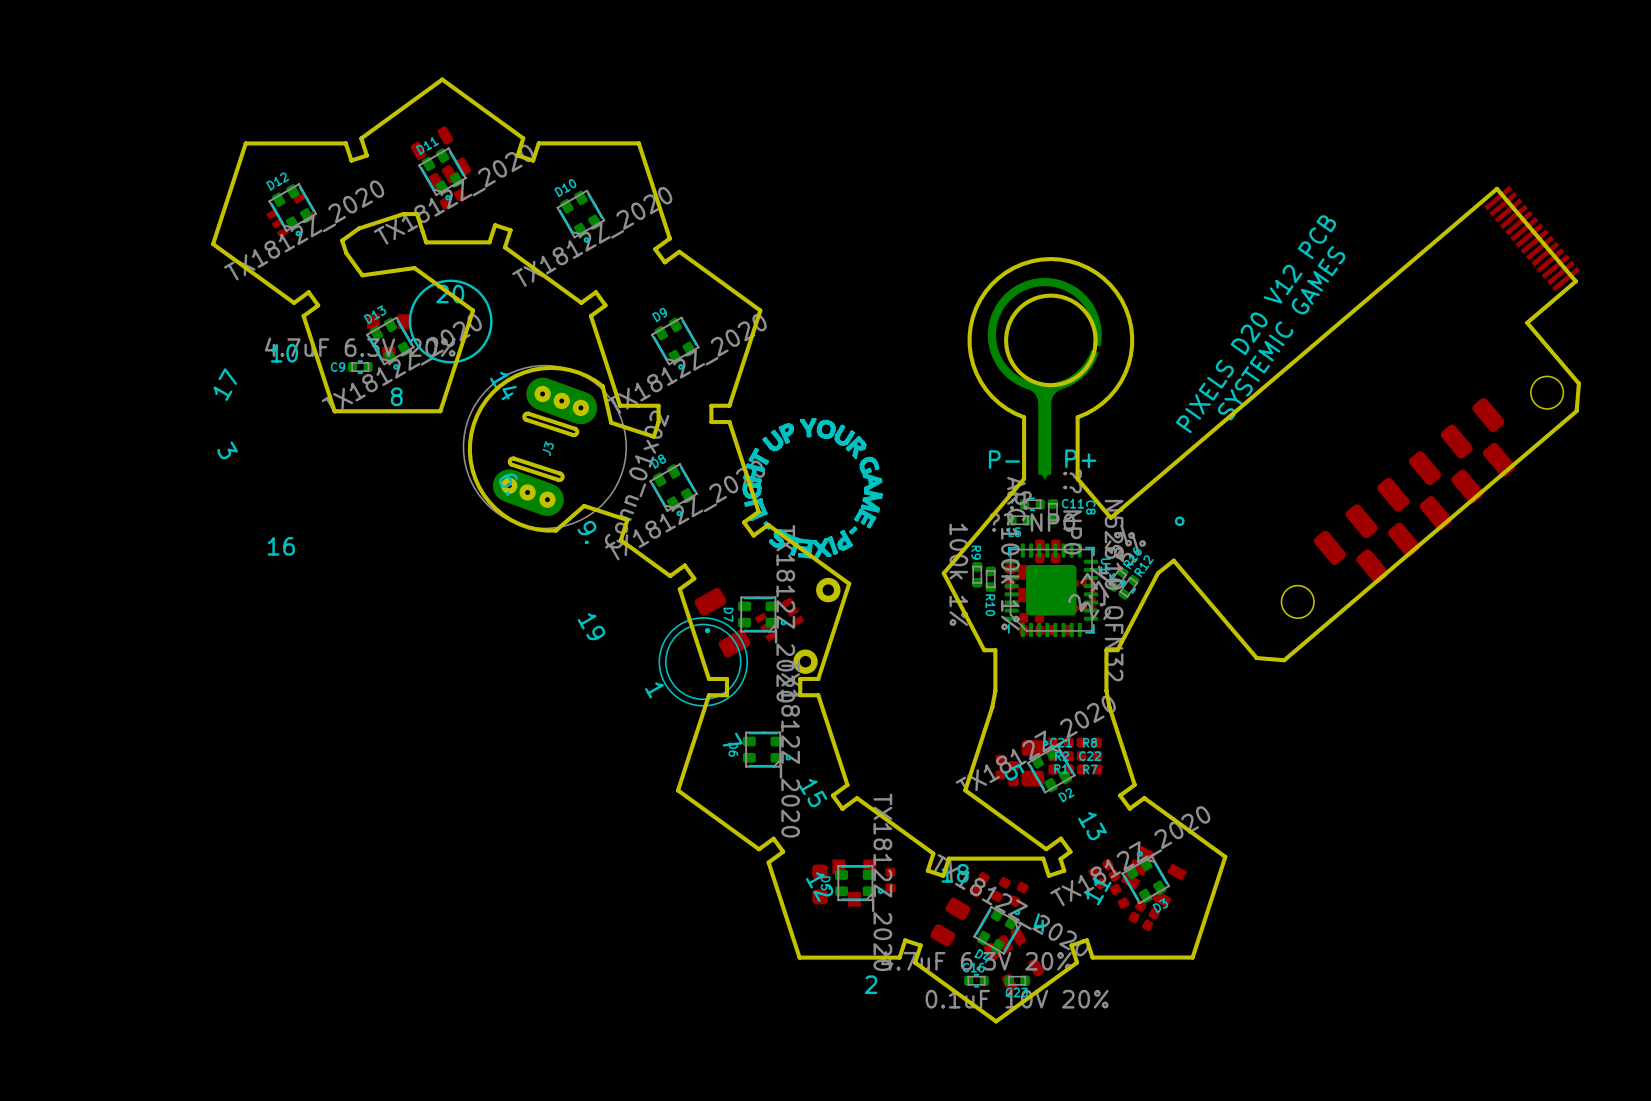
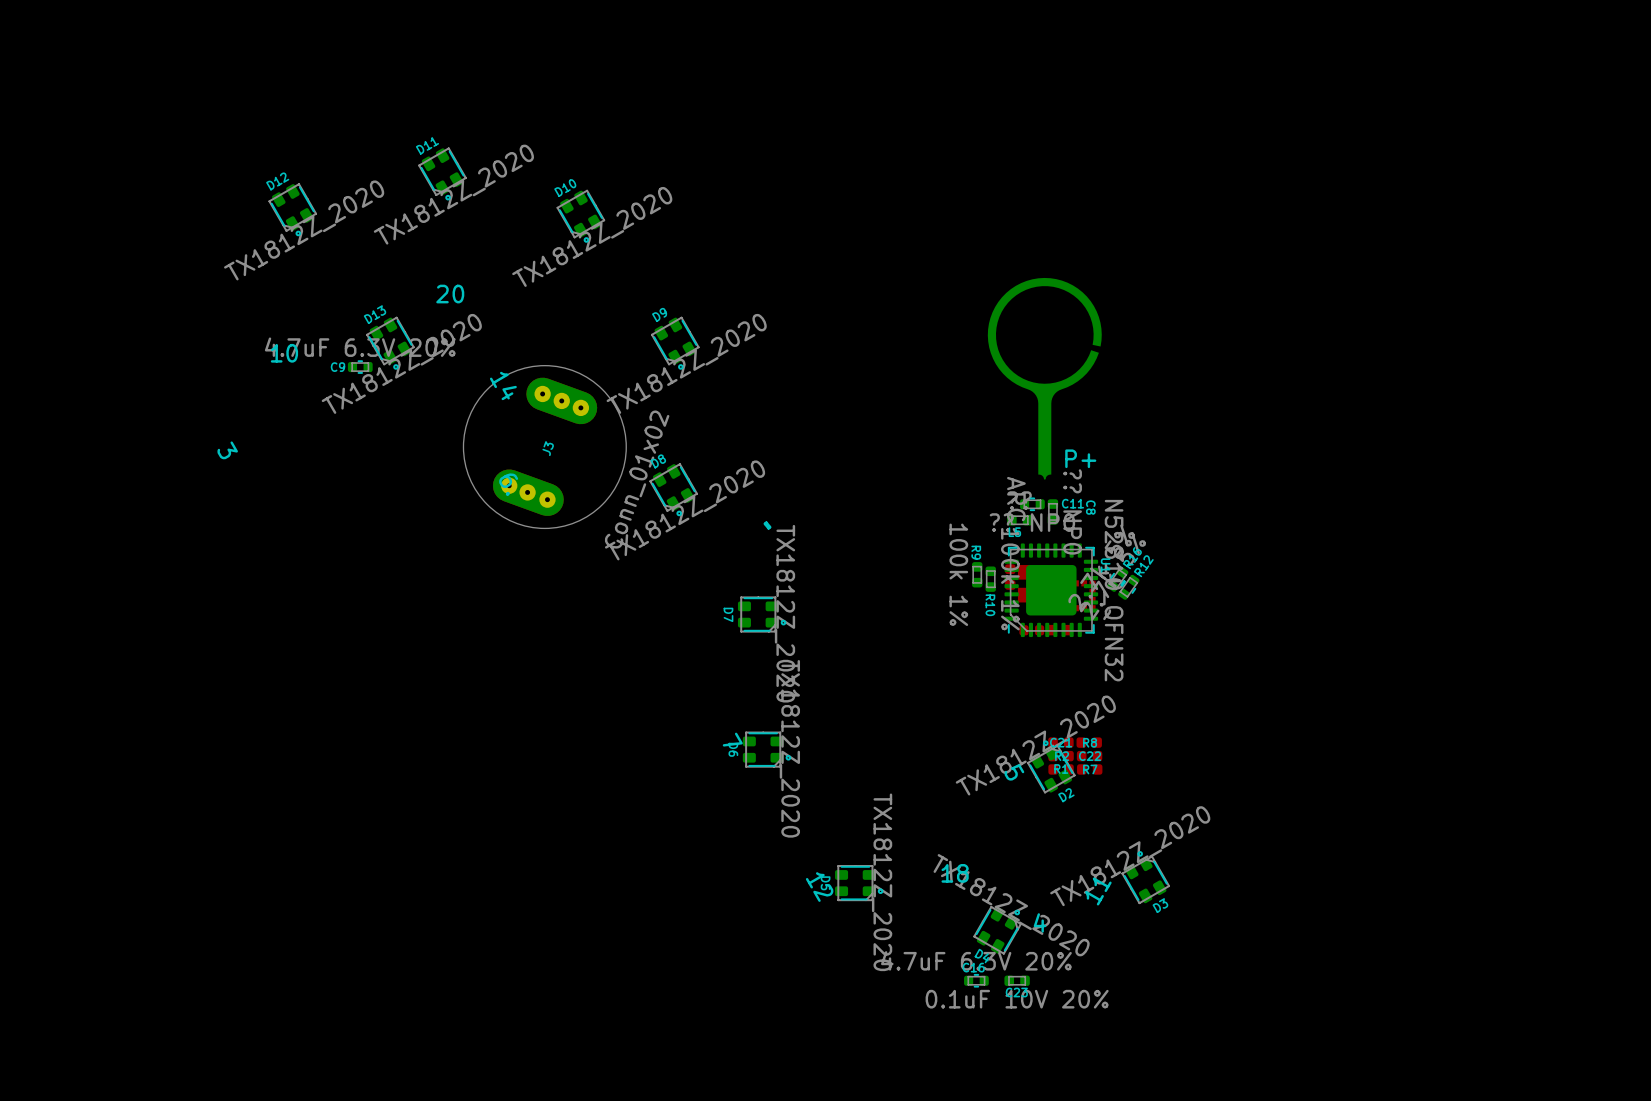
board edge: (442, 79) (523, 138) (517, 155) (533, 160) (538, 143) (638, 143) (669, 238) (655, 249) (664, 262) (679, 251) (760, 310) (729, 405) (711, 405) (711, 422) (729, 422) (758, 511) (744, 522) (753, 535) (768, 524) (849, 583) (818, 678) (800, 678) (800, 695) (818, 695) (847, 784) (832, 795) (842, 808) (857, 798) (933, 853) (927, 870) (943, 875) (948, 858) (1043, 858) (1048, 875) (1064, 870) (1060, 859) (1070, 851) (1060, 838) (1046, 849) (965, 790) (992, 707) (995, 690) (995, 650) (984, 650) (943, 573) (1024, 478) (1024, 417) (1006, 408) (986, 389) (976, 373) (969, 345) (970, 326) (980, 300) (991, 284) (1005, 272) (1032, 261) (1050, 259) (1069, 261) (1087, 267) (1103, 278) (1116, 292) (1125, 308) (1132, 336) (1130, 355) (1125, 373) (1115, 389) (1102, 403) (1077, 417) (1077, 478) (1110, 517) (1496, 188) (1575, 281) (1527, 322) (1578, 383) (1576, 411) (1284, 660) (1256, 658) (1173, 560) (1158, 573) (1117, 650) (1106, 650) (1106, 690) (1109, 707) (1134, 784) (1120, 795) (1129, 808) (1144, 798) (1225, 856) (1192, 957) (1092, 957) (1086, 940) (1071, 945) (1077, 962) (996, 1021) (915, 962) (920, 945) (905, 940) (899, 957) (799, 957) (768, 862) (783, 851) (773, 838) (759, 849) (678, 790) (708, 695) (726, 695) (726, 678) (708, 678) (679, 589) (694, 578) (684, 565) (670, 576) (620, 540) (627, 520) (584, 505) (555, 530) (537, 529) (519, 524) (503, 515) (489, 502) (479, 487) (472, 470) (469, 451) (471, 433) (477, 415) (486, 399) (499, 386) (515, 376) (532, 370) (560, 368) (587, 376) (602, 386) (611, 422) (653, 436) (658, 422) (658, 405) (620, 405) (590, 316) (605, 305) (595, 292) (581, 302) (504, 247) (510, 230) (495, 225) (489, 242) (426, 242) (416, 214) (403, 214) (358, 228) (342, 240) (346, 253) (362, 275) (414, 268) (473, 310) (440, 411) (334, 411) (303, 316) (318, 305) (308, 292) (294, 302) (213, 244) (245, 143) (345, 143) (351, 160) (366, 155) (361, 138) (442, 79) -> none
part: (440, 158) -> none
part: (452, 199) -> none
part: (291, 215) -> none
part: (1532, 238) -> none
drawing: [408, 279, 493, 364] -> none
round board edge: [1004, 293, 1098, 388] -> none
text: PIXELS D20 V12 PCB (1256, 324) -> none
text: SYSTEMIC GAMES (1281, 333) -> none
part: (388, 337) -> none
text: 17 (225, 384) -> none
text: 8 (396, 396) -> none
board edge: (528, 413) (575, 428) (576, 433) (573, 434) (526, 419) (524, 415) (528, 413) -> none
line: (815, 419) (809, 430) (810, 435) (808, 436) (807, 430) (801, 420) (803, 420) (808, 428) (812, 419) (815, 419) -> none
line: (824, 421) (831, 422) (834, 427) (832, 434) (828, 437) (821, 436) (818, 431) (819, 424) (824, 421) -> none
line: (824, 422) (822, 424) (820, 430) (823, 435) (827, 435) (832, 427) (831, 424) (824, 422) -> none
line: (788, 424) (780, 427) (786, 442) (788, 441) (782, 428) (787, 426) (790, 428) (788, 435) (792, 429) (788, 424) -> none
line: (842, 426) (843, 427) (837, 438) (840, 441) (845, 441) (851, 431) (853, 432) (848, 441) (843, 444) (835, 438) (842, 426) -> none
line: (774, 431) (780, 438) (781, 444) (773, 449) (763, 439) (765, 438) (773, 447) (778, 446) (779, 441) (772, 432) (774, 431) -> none
line: (858, 437) (847, 448) (848, 449) (859, 440) (862, 443) (862, 446) (855, 446) (853, 455) (855, 457) (857, 448) (863, 448) (865, 444) (858, 437) -> none
line: (755, 449) (749, 459) (751, 460) (753, 456) (766, 463) (767, 461) (754, 454) (757, 450) (755, 449) -> none
board edge: (514, 458) (560, 473) (562, 478) (558, 479) (511, 464) (510, 460) (514, 458) -> none
line: (869, 458) (874, 460) (877, 468) (876, 468) (871, 460) (867, 460) (862, 464) (862, 467) (864, 471) (869, 469) (870, 471) (864, 473) (861, 464) (864, 459) (869, 458) -> none
text: P- (1004, 459) -> none
line: (747, 464) (747, 466) (754, 468) (751, 477) (745, 476) (744, 478) (760, 482) (760, 480) (753, 478) (755, 469) (762, 470) (763, 468) (747, 464) -> none
line: (864, 474) (880, 479) (880, 481) (865, 490) (865, 488) (870, 485) (869, 480) (871, 484) (878, 480) (864, 476) (864, 474) -> none
line: (759, 484) (752, 484) (752, 486) (758, 486) (758, 490) (757, 493) (752, 495) (747, 494) (746, 484) (744, 484) (746, 495) (756, 496) (760, 491) (759, 484) -> none
line: (865, 491) (865, 493) (878, 495) (864, 498) (875, 508) (862, 505) (862, 507) (877, 511) (878, 508) (866, 500) (880, 497) (881, 494) (865, 491) -> none
part: (1422, 497) -> none
line: (761, 499) (745, 503) (746, 505) (761, 501) (761, 499) -> none
line: (762, 503) (760, 504) (763, 512) (750, 517) (751, 519) (766, 513) (762, 503) -> none
line: (860, 509) (855, 519) (857, 520) (861, 512) (866, 515) (862, 522) (863, 523) (867, 516) (872, 518) (868, 526) (869, 527) (874, 517) (860, 509) -> none
drawing: [1174, 516, 1185, 527] -> none
line: (854, 527) (850, 531) (851, 532) (855, 529) (854, 527) -> none
line: (778, 530) (787, 535) (786, 537) (779, 532) (777, 533) (777, 536) (782, 540) (779, 546) (770, 541) (771, 540) (777, 545) (780, 543) (780, 541) (775, 536) (778, 530) -> none
line: (843, 531) (841, 532) (848, 544) (843, 547) (841, 546) (842, 538) (838, 544) (843, 549) (851, 545) (843, 531) -> none
text: 9. (586, 532) -> none
line: (789, 535) (788, 537) (796, 540) (791, 553) (793, 554) (799, 539) (789, 535) -> none
line: (831, 537) (836, 552) (834, 553) (829, 538) (831, 537) -> none
line: (801, 539) (800, 541) (809, 542) (808, 548) (800, 547) (800, 548) (808, 549) (807, 555) (799, 554) (799, 555) (809, 557) (811, 541) (801, 539) -> none
line: (827, 539) (822, 548) (830, 555) (827, 555) (821, 549) (817, 557) (815, 557) (820, 548) (812, 541) (815, 541) (821, 546) (825, 539) (827, 539) -> none
part: (1047, 544) -> none
text: 16 (281, 546) -> none
part: (1047, 557) -> none
part: (828, 590) -> none
drawing: [658, 617, 748, 707] -> none
part: (1031, 617) -> none
part: (779, 619) -> none
part: (722, 622) -> none
text: 19 (591, 626) -> none
part: (805, 661) -> none
text: 1 (654, 690) -> none
part: (1032, 763) -> none
part: (1000, 767) -> none
part: (1013, 773) -> none
text: 15 (813, 793) -> none
text: 13 (1092, 826) -> none
part: (1101, 868) -> none
part: (1153, 876) -> none
part: (890, 879) -> none
part: (1107, 879) -> none
part: (854, 883) -> none
part: (819, 884) -> none
part: (979, 884) -> none
part: (1000, 889) -> none
part: (1018, 894) -> none
part: (1119, 896) -> none
part: (1147, 909) -> none
part: (1140, 921) -> none
part: (950, 922) -> none
part: (1013, 959) -> none
text: 2 (871, 984) -> none

